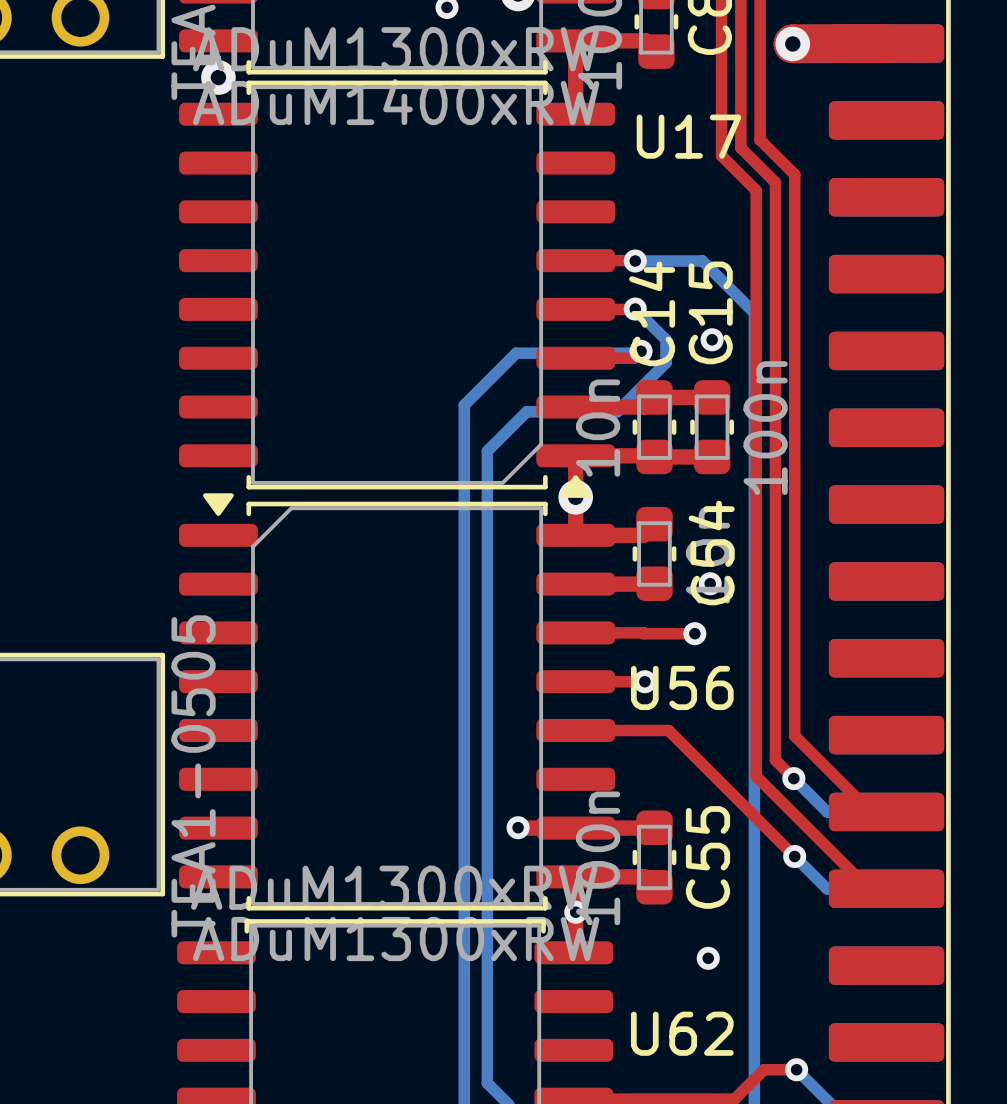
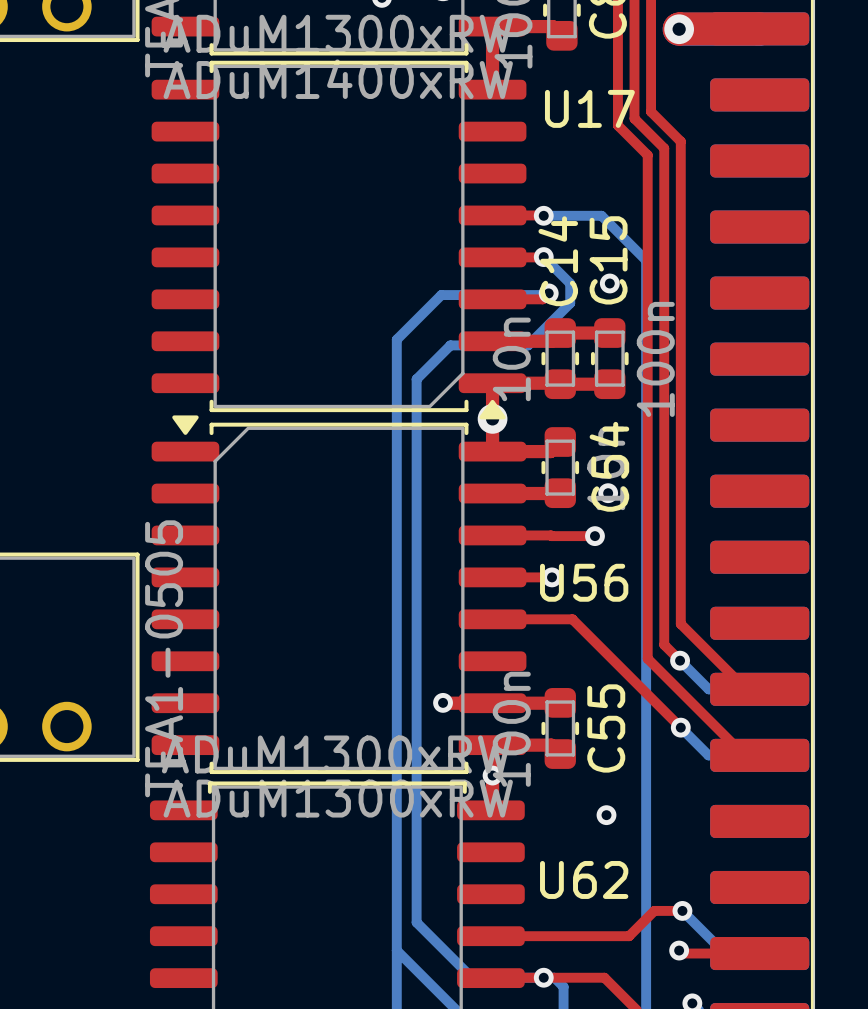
via: (218, 77) -> none

